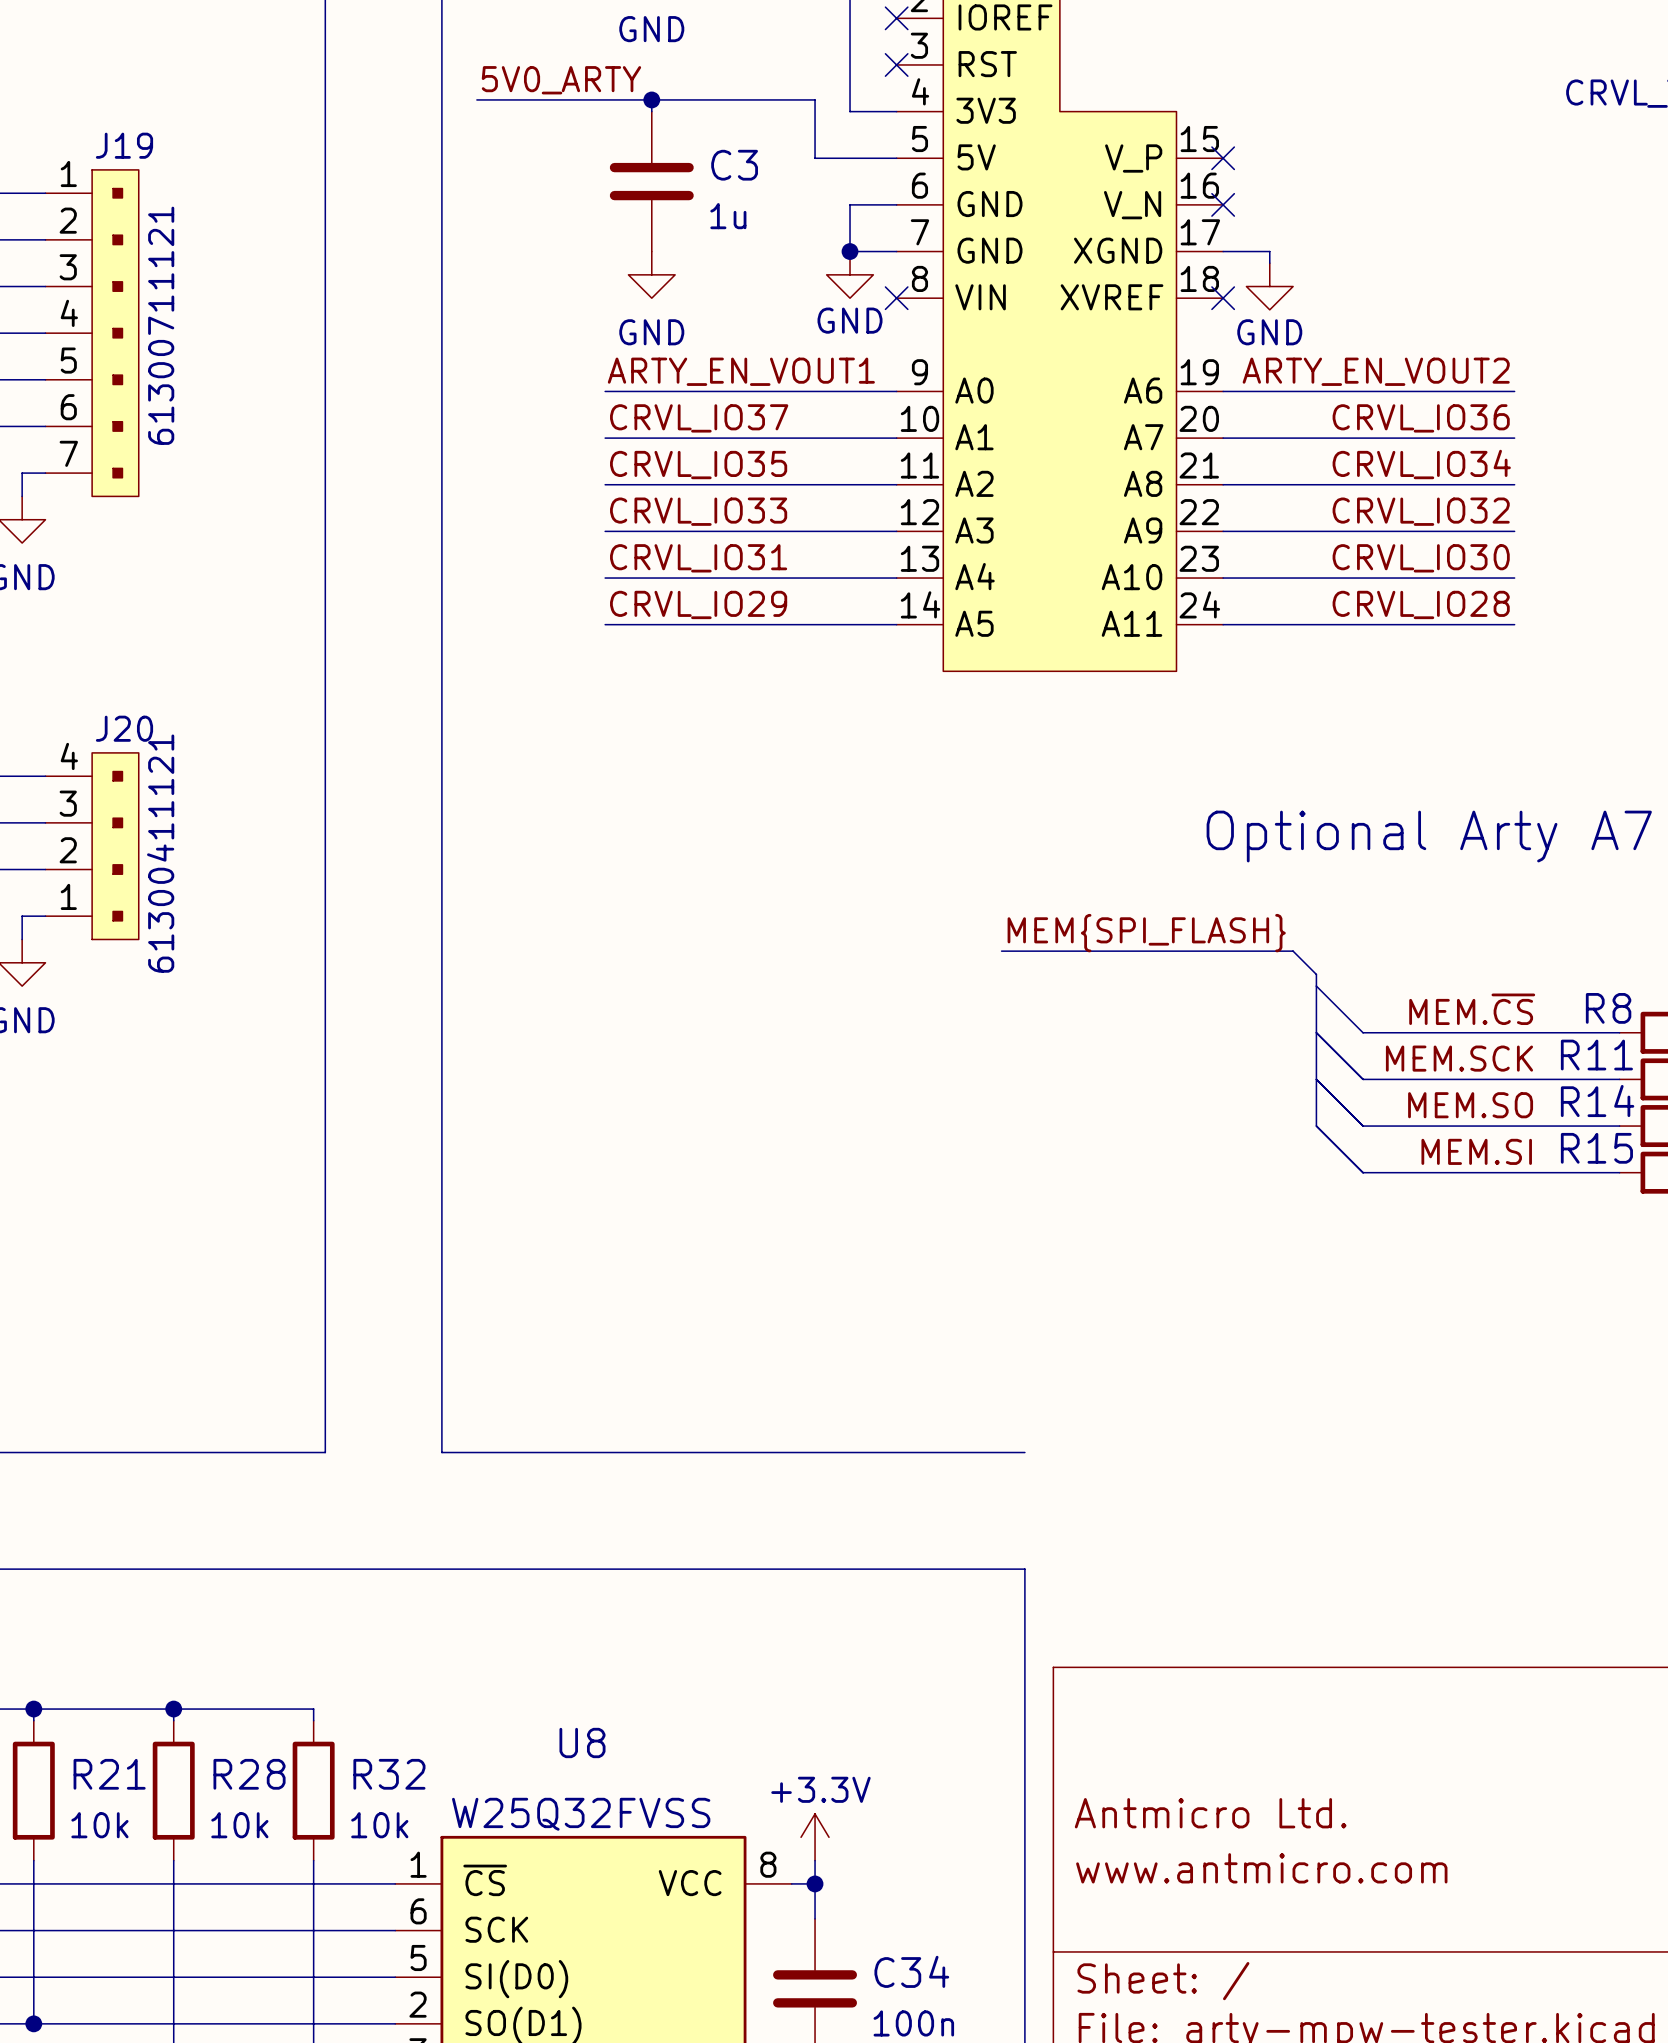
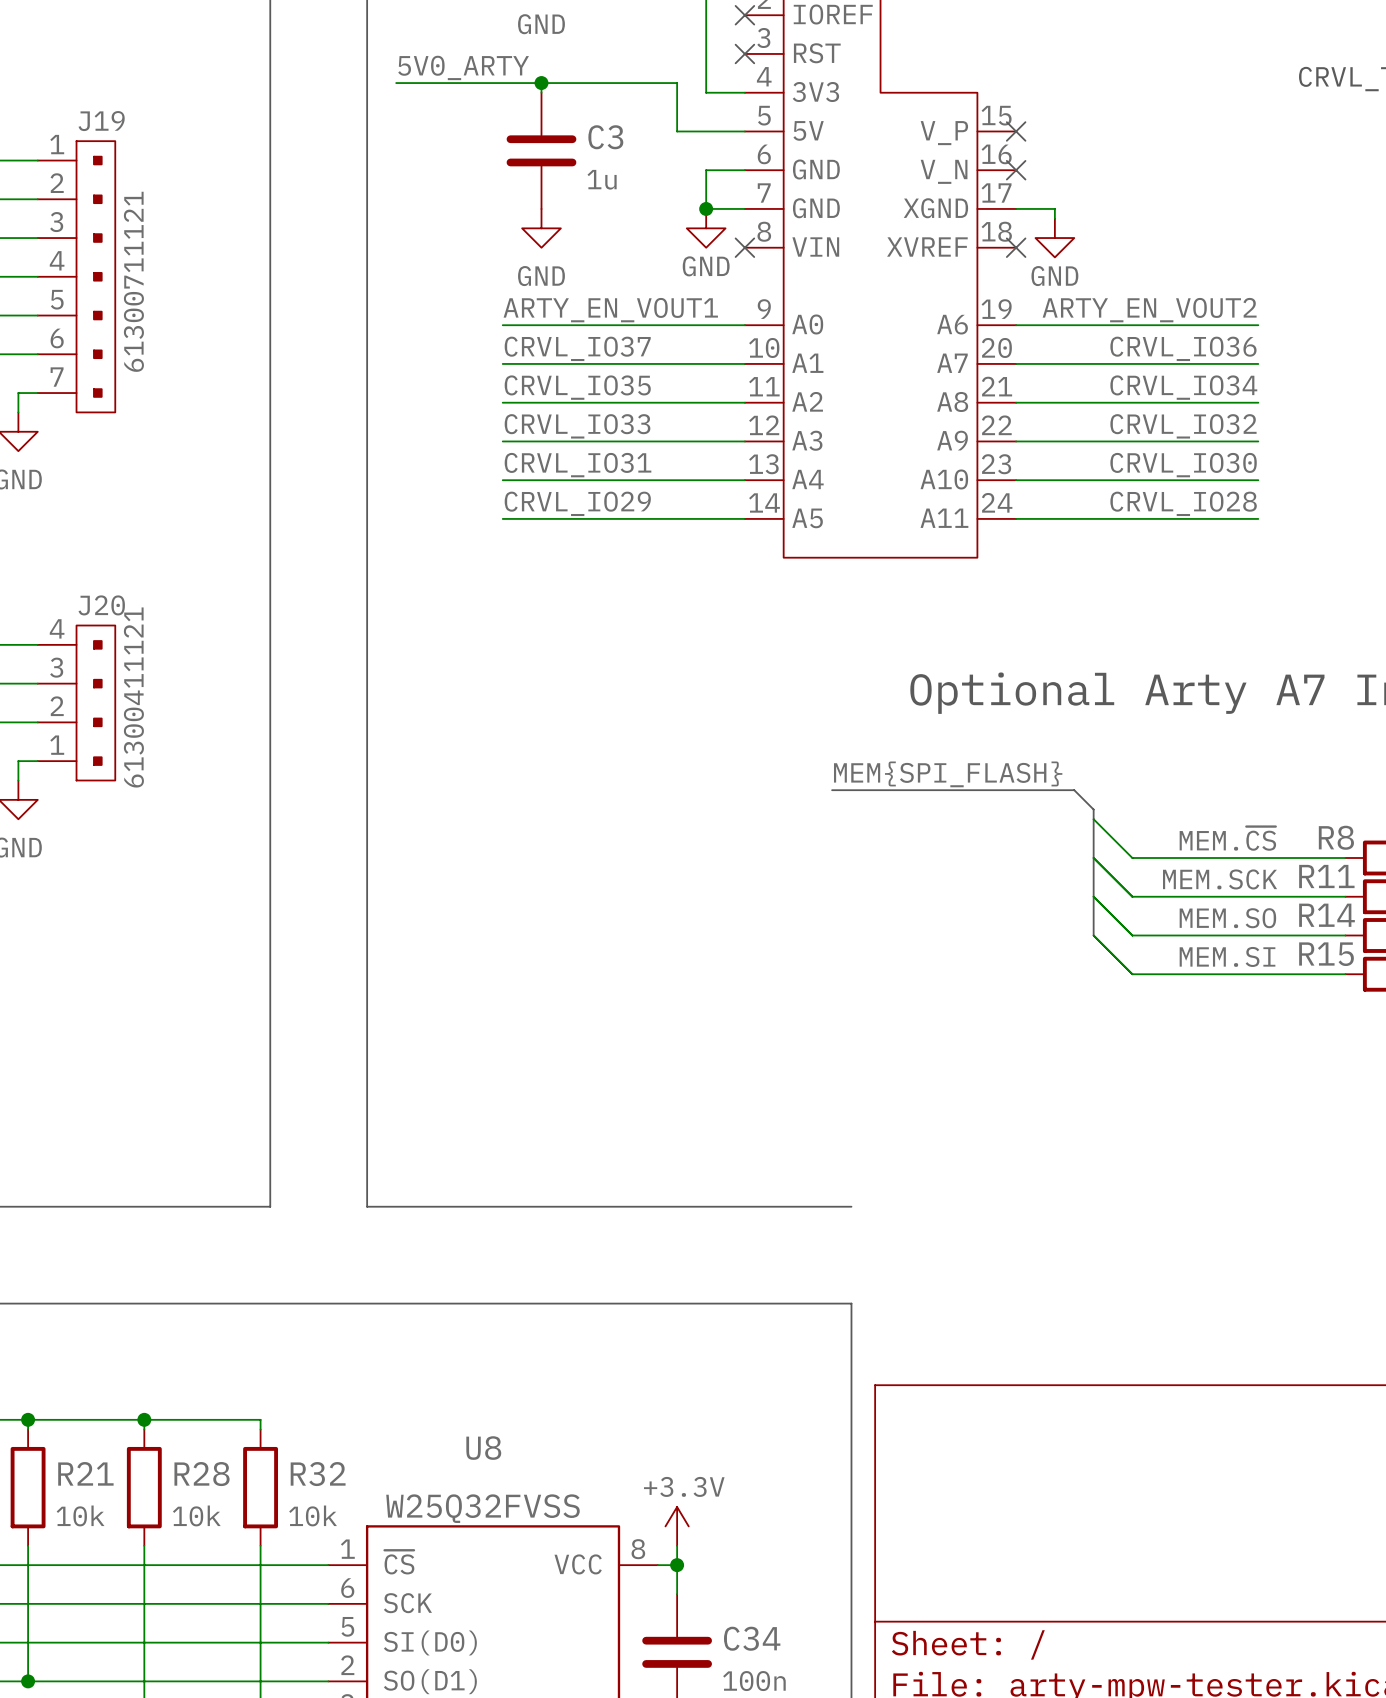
title block: Antmicro Ltd. (1210, 1813) -> none
title block: www.antmicro.com (1261, 1868) -> none

